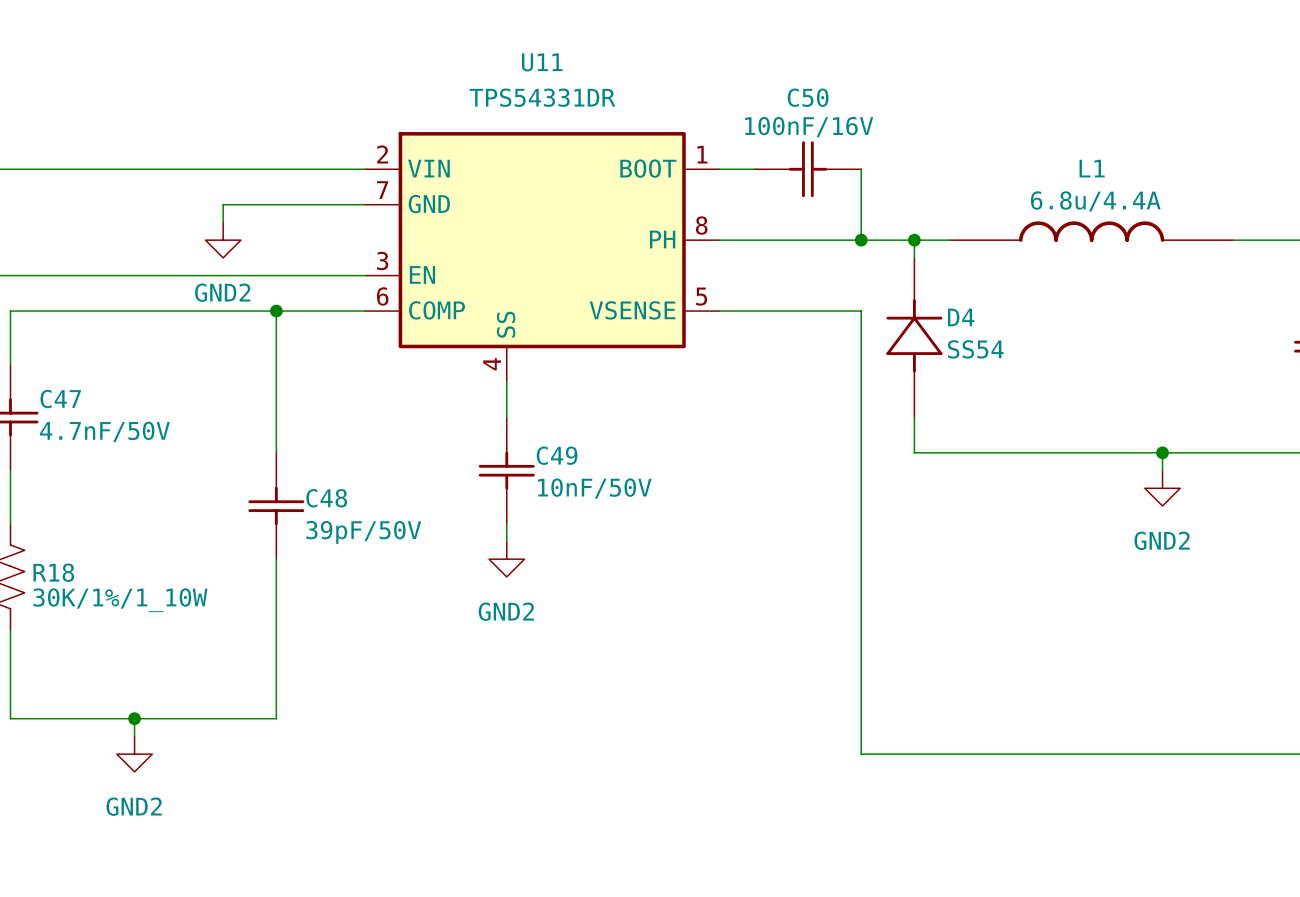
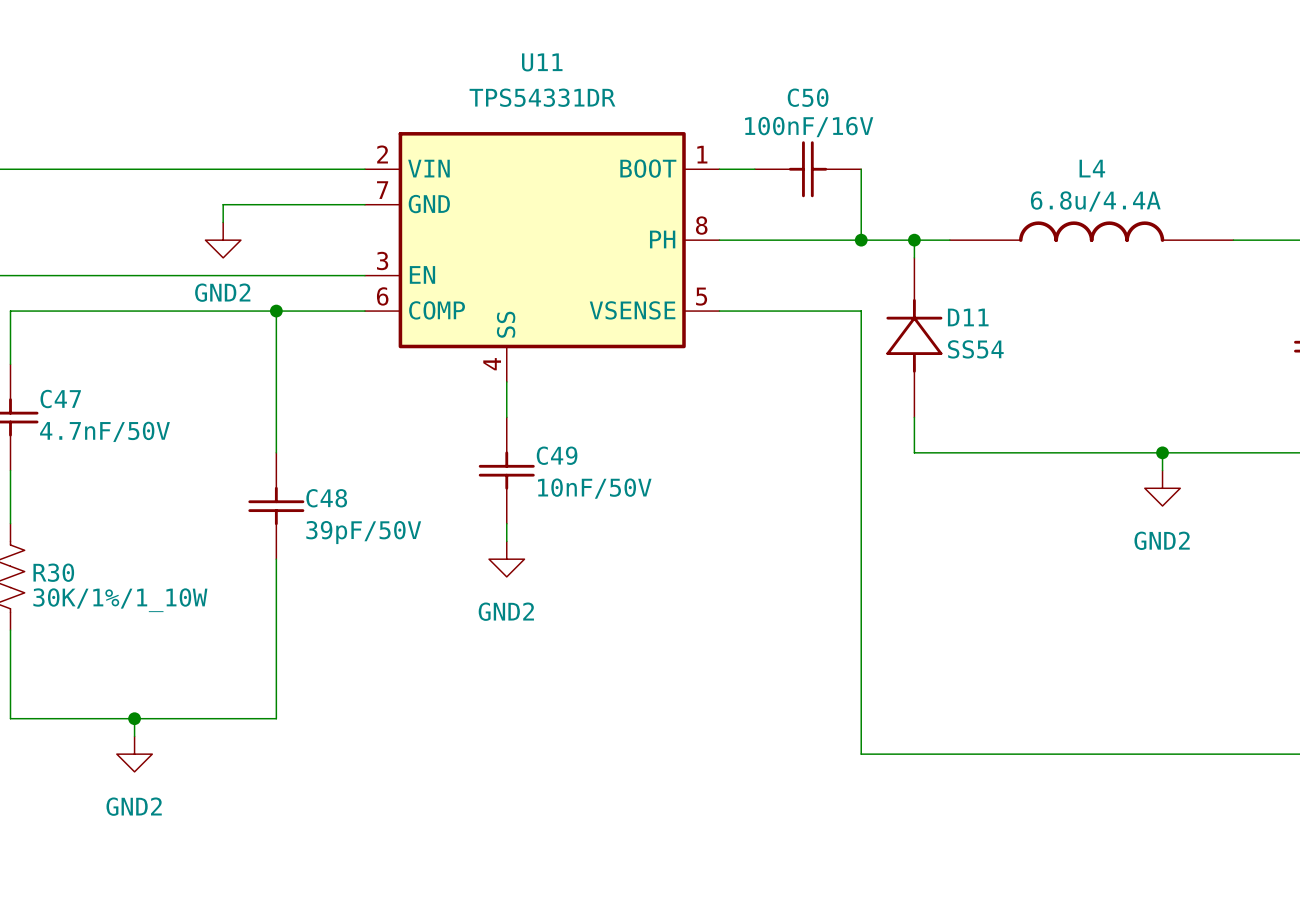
L1 name: L1 (1092, 168) -> L4 (1092, 168)
D4 name: D4 (961, 317) -> D11 (968, 317)
R18 name: R18 (53, 572) -> R30 (53, 572)

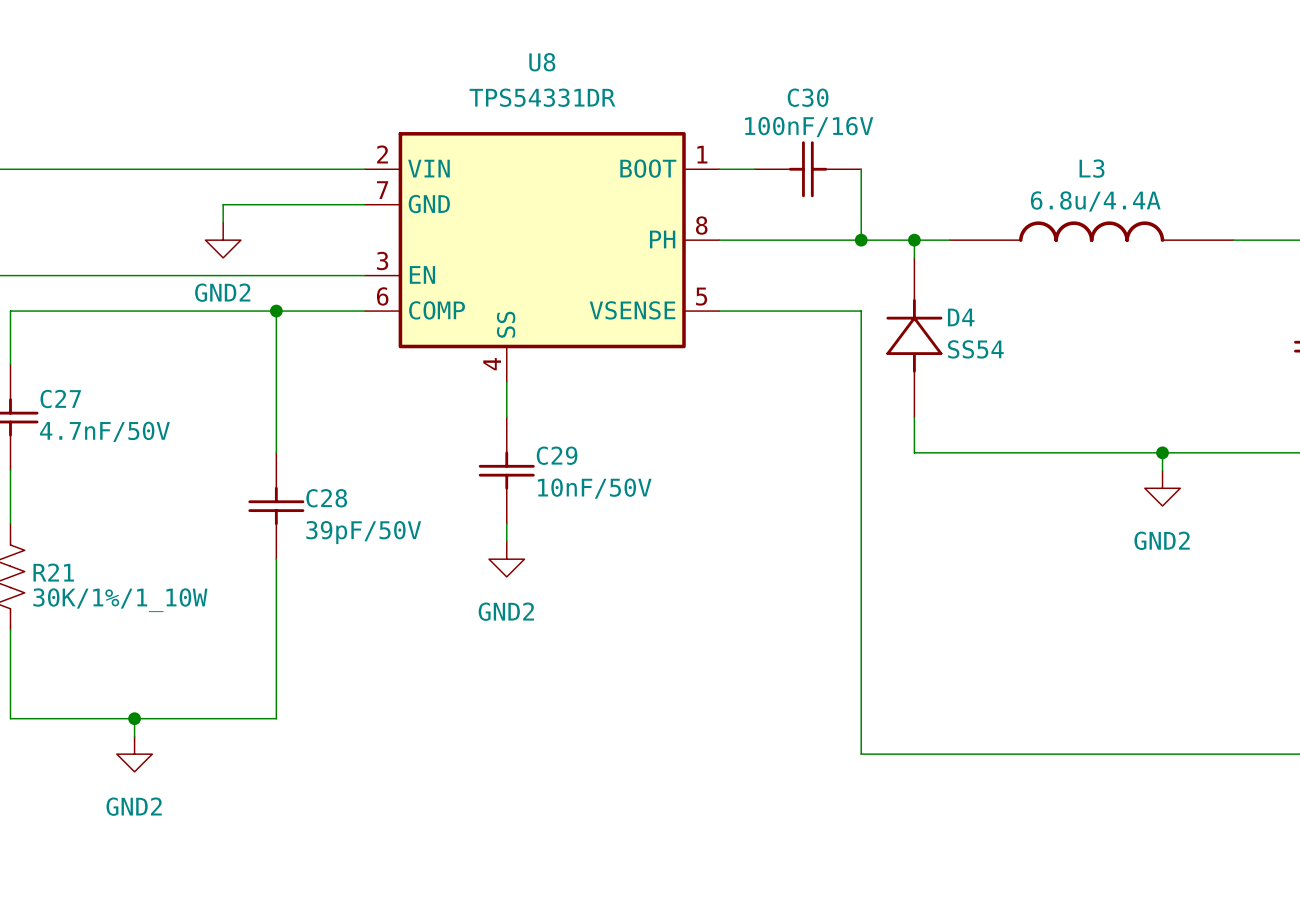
U11 name: U11 (542, 62) -> U8 (542, 62)
C50 name: C50 (808, 97) -> C30 (808, 97)
L4 name: L4 (1092, 168) -> L3 (1092, 168)
D11 name: D11 (968, 317) -> D4 (961, 317)
C47 name: C47 (60, 399) -> C27 (60, 399)
C49 name: C49 (557, 455) -> C29 (557, 455)
C48 name: C48 (326, 498) -> C28 (326, 498)
R30 name: R30 (53, 572) -> R21 (53, 572)

